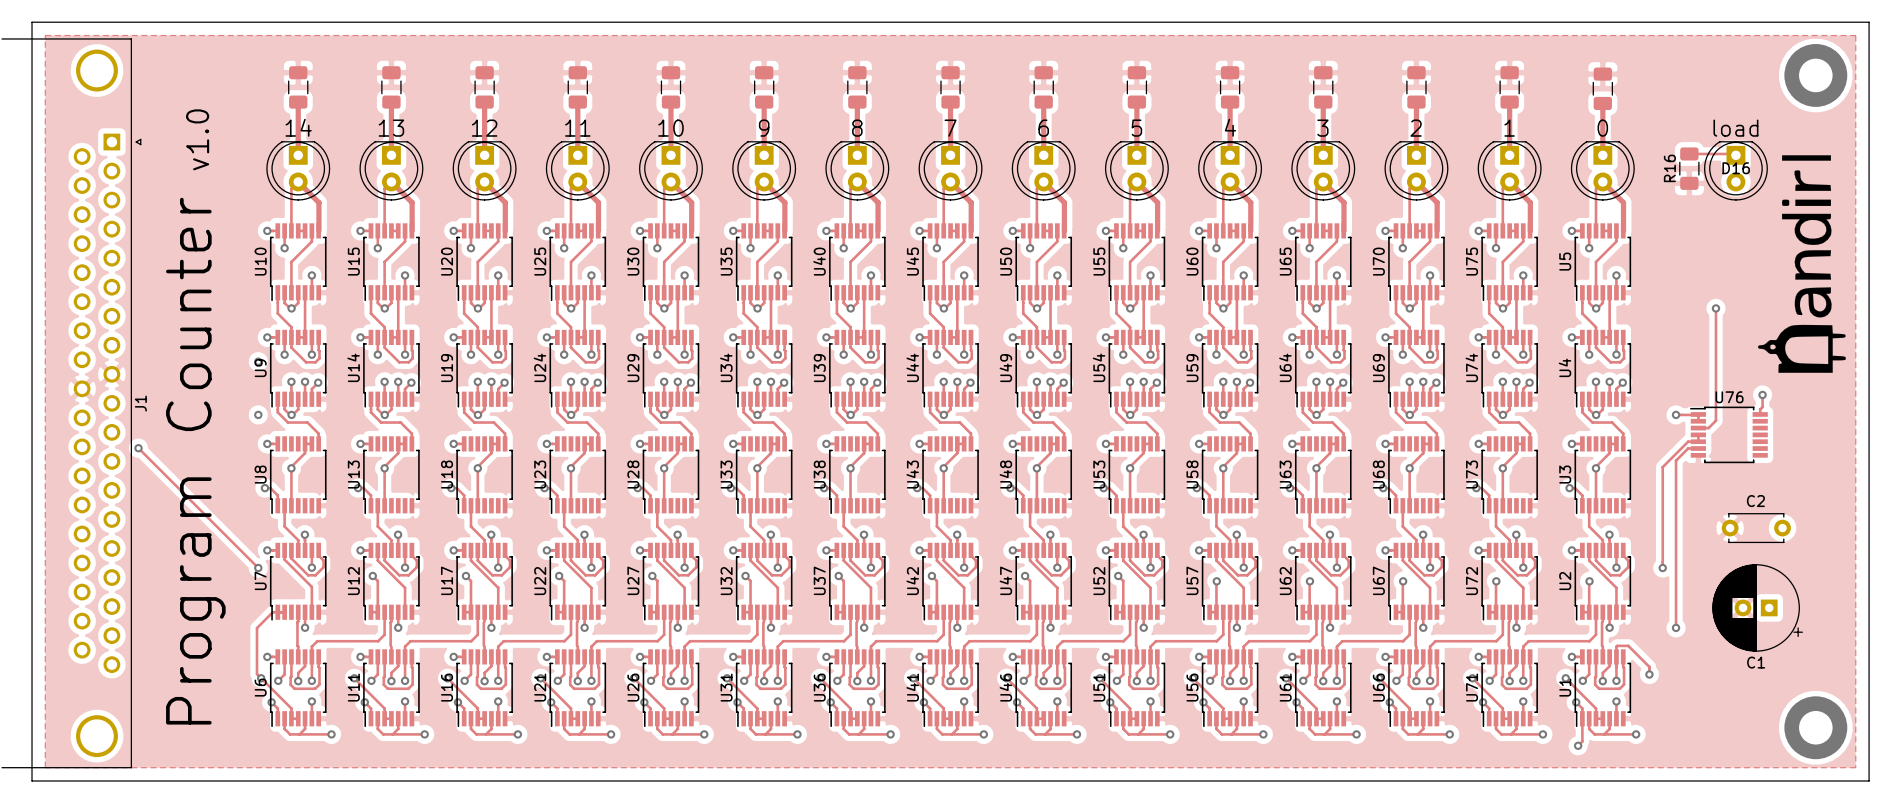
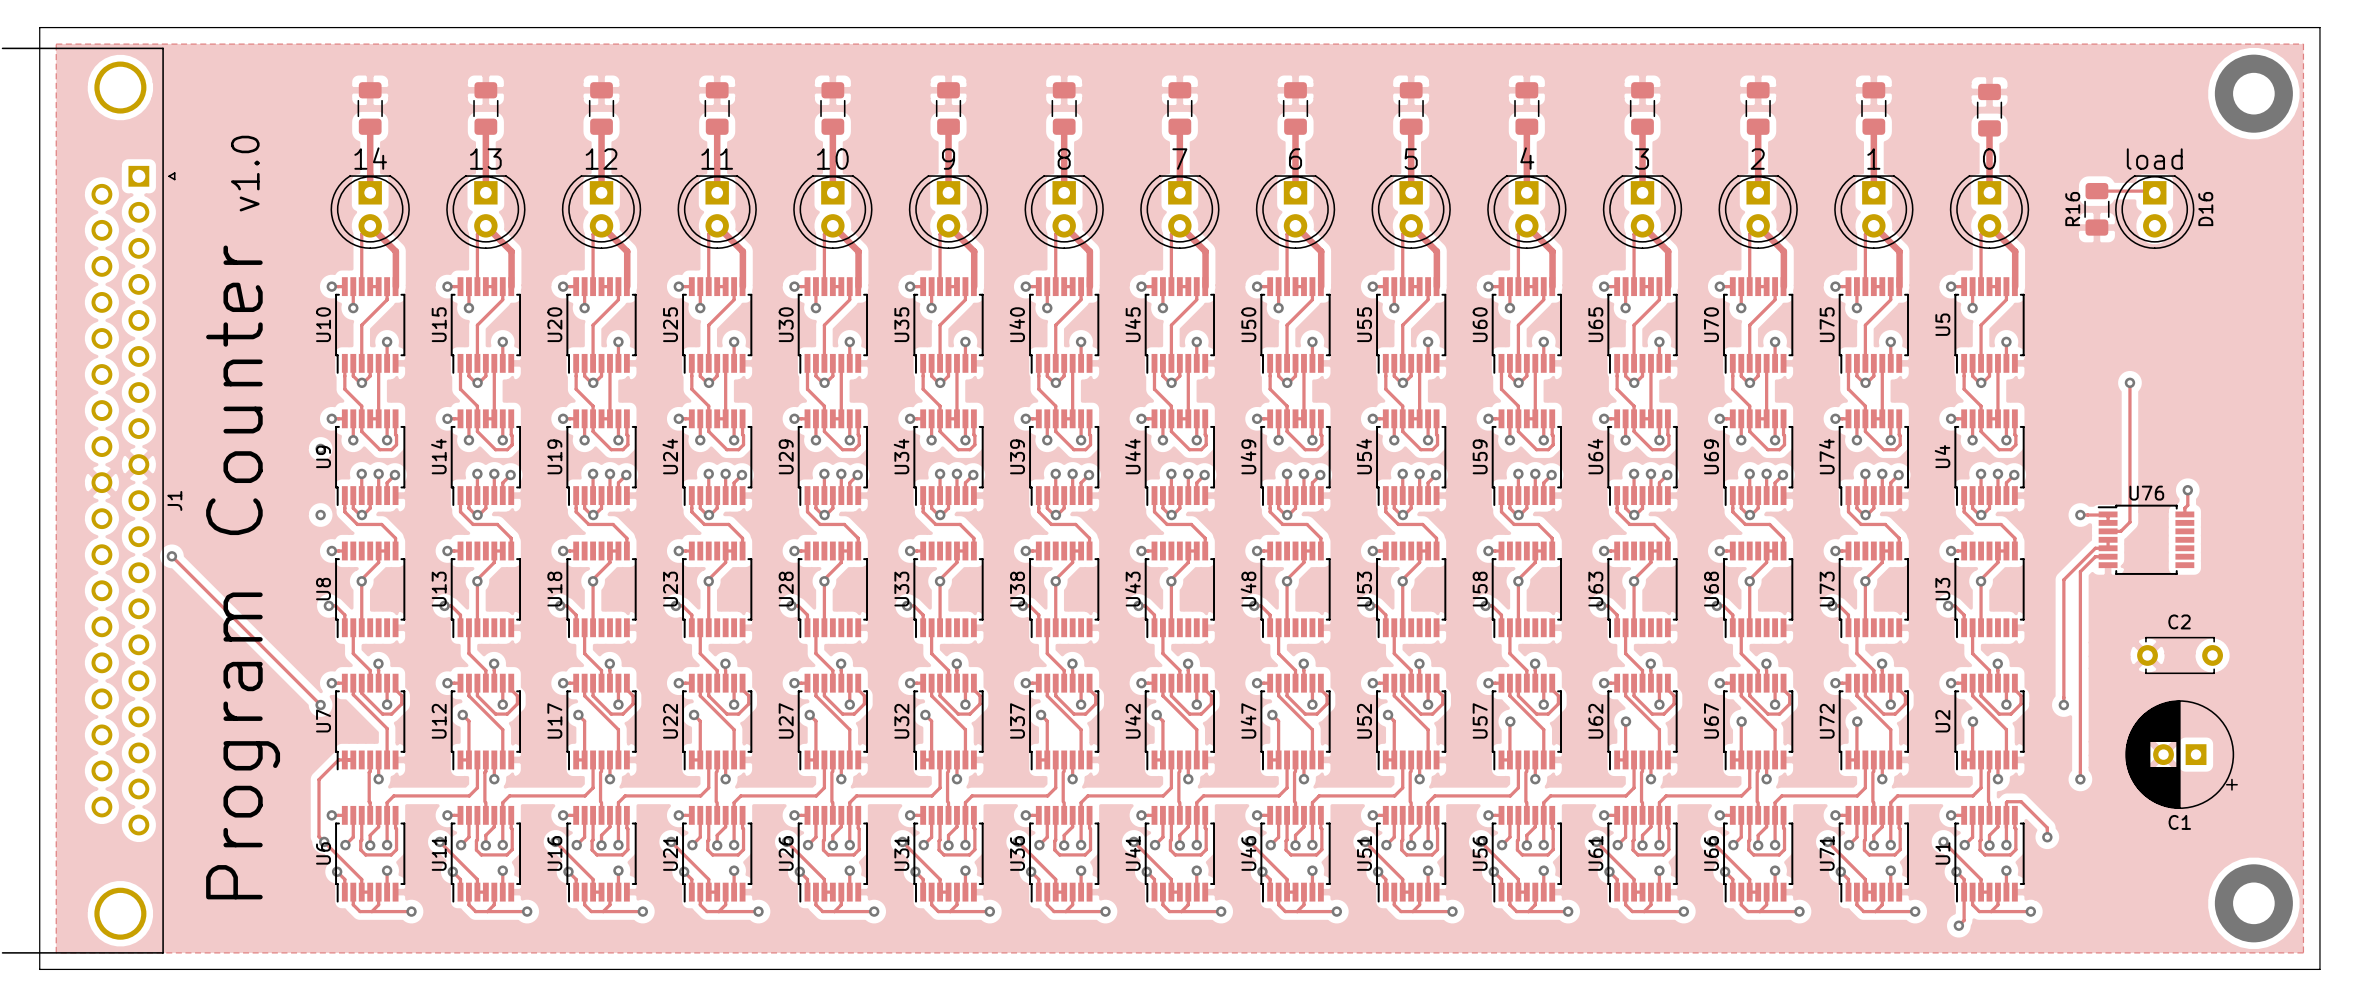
drawing: [1758, 155, 1846, 373] -> none
D16 name rotation: 0° (1736, 168) -> 90° counterclockwise (2205, 209)
D16 name position: D16 (1736, 168) -> D16 (2205, 209)

